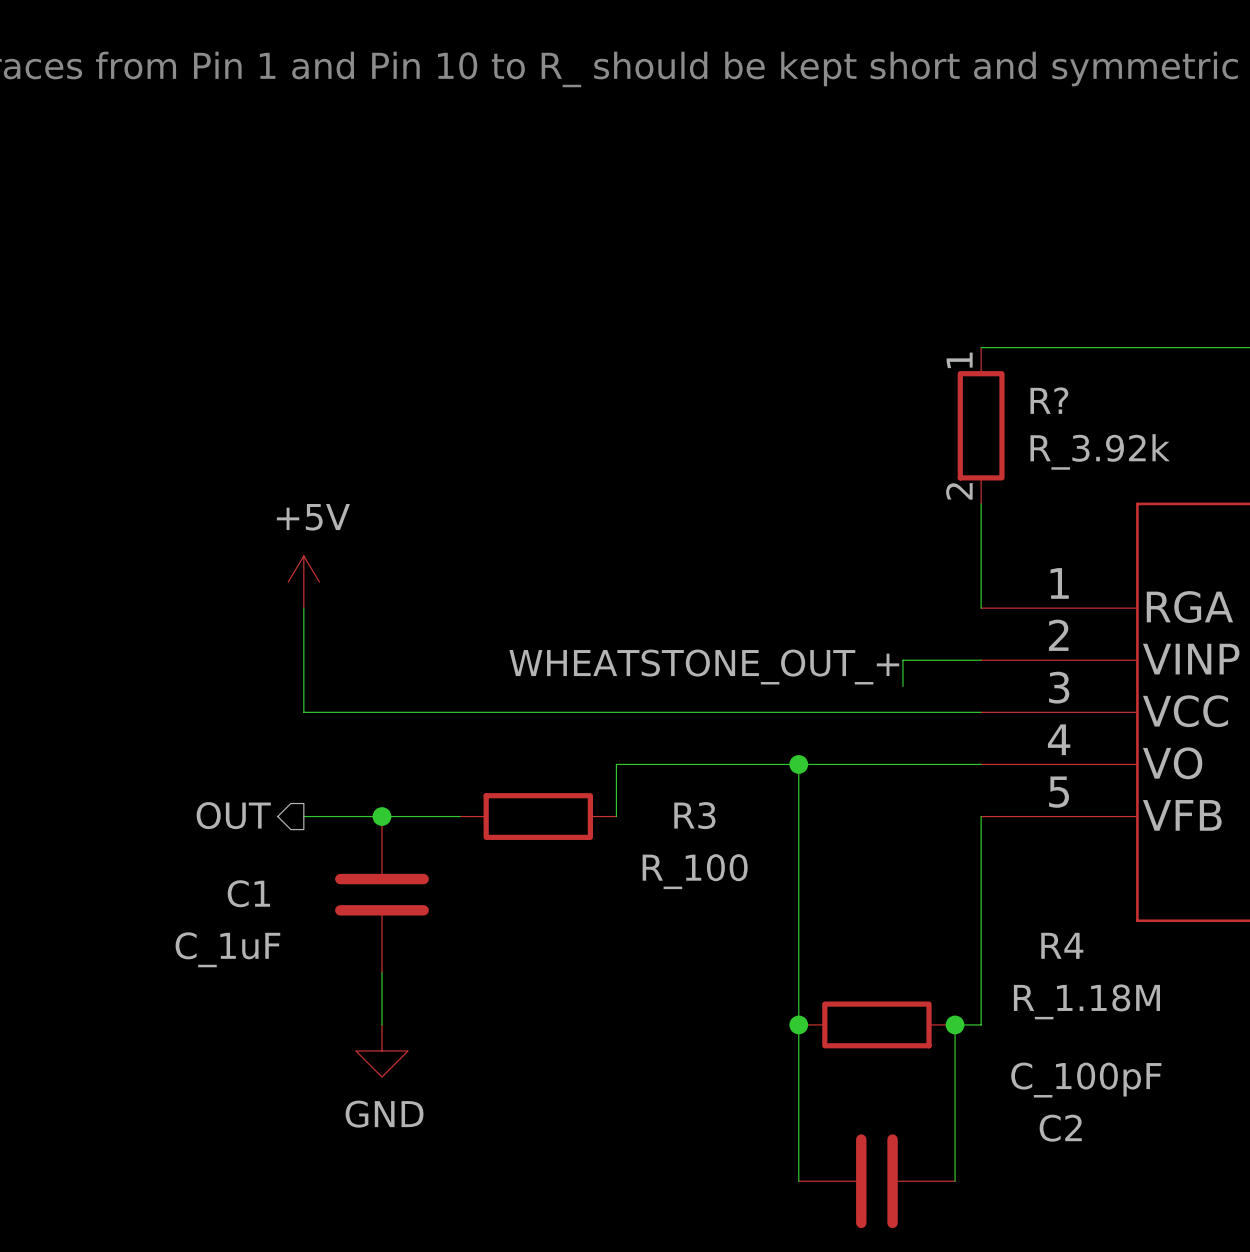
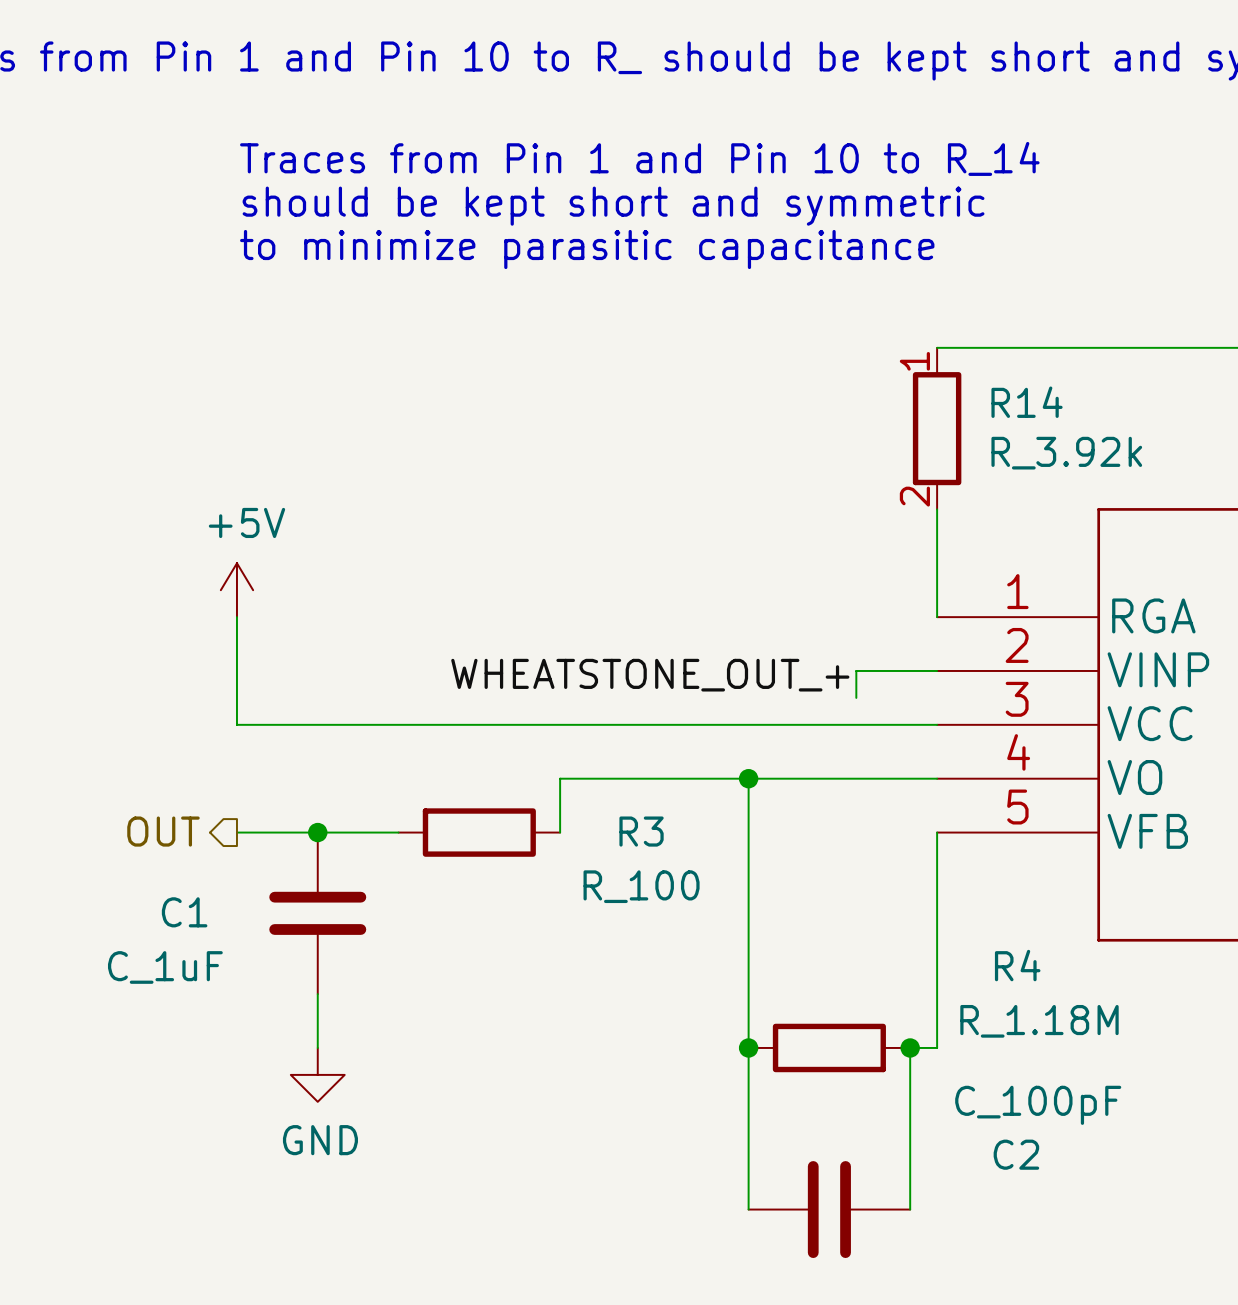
text: none -> Traces from Pin 1 and Pin 10 to R_14 (639, 158)
text: none -> should be kept short and symmetric (613, 206)
text: none -> to minimize parasitic capacitance (587, 249)
R? name: R? (1049, 400) -> R14 (1027, 402)

